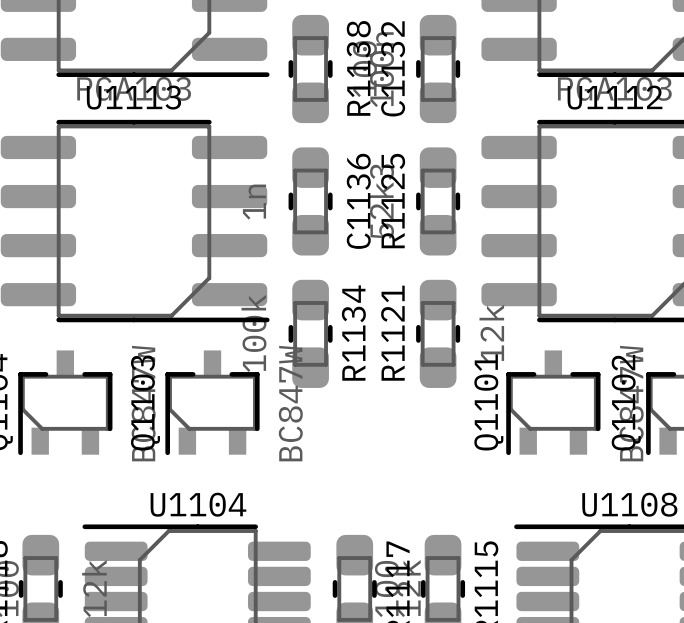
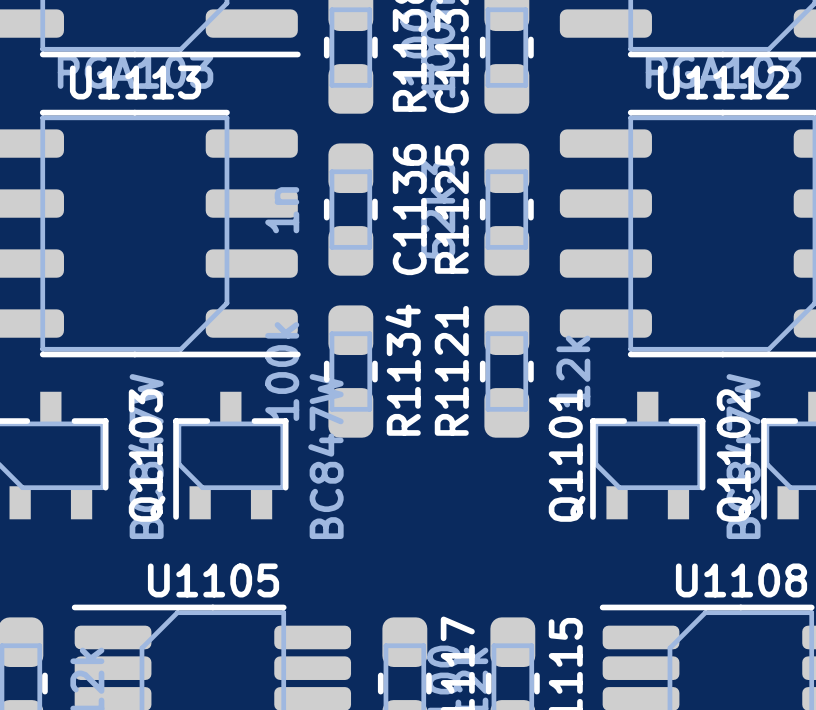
U1104 name: U1104 (198, 504) -> U1105 (213, 580)

